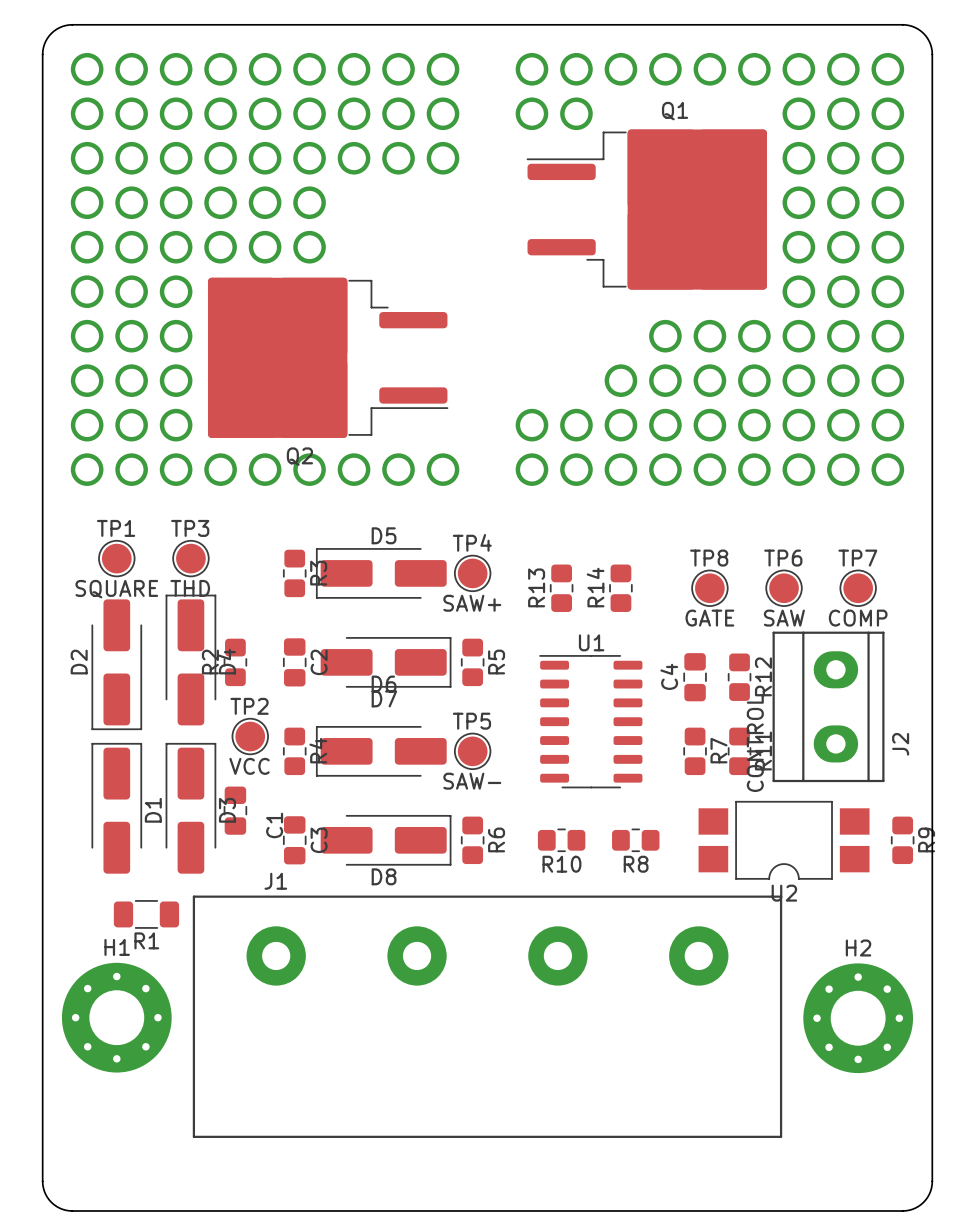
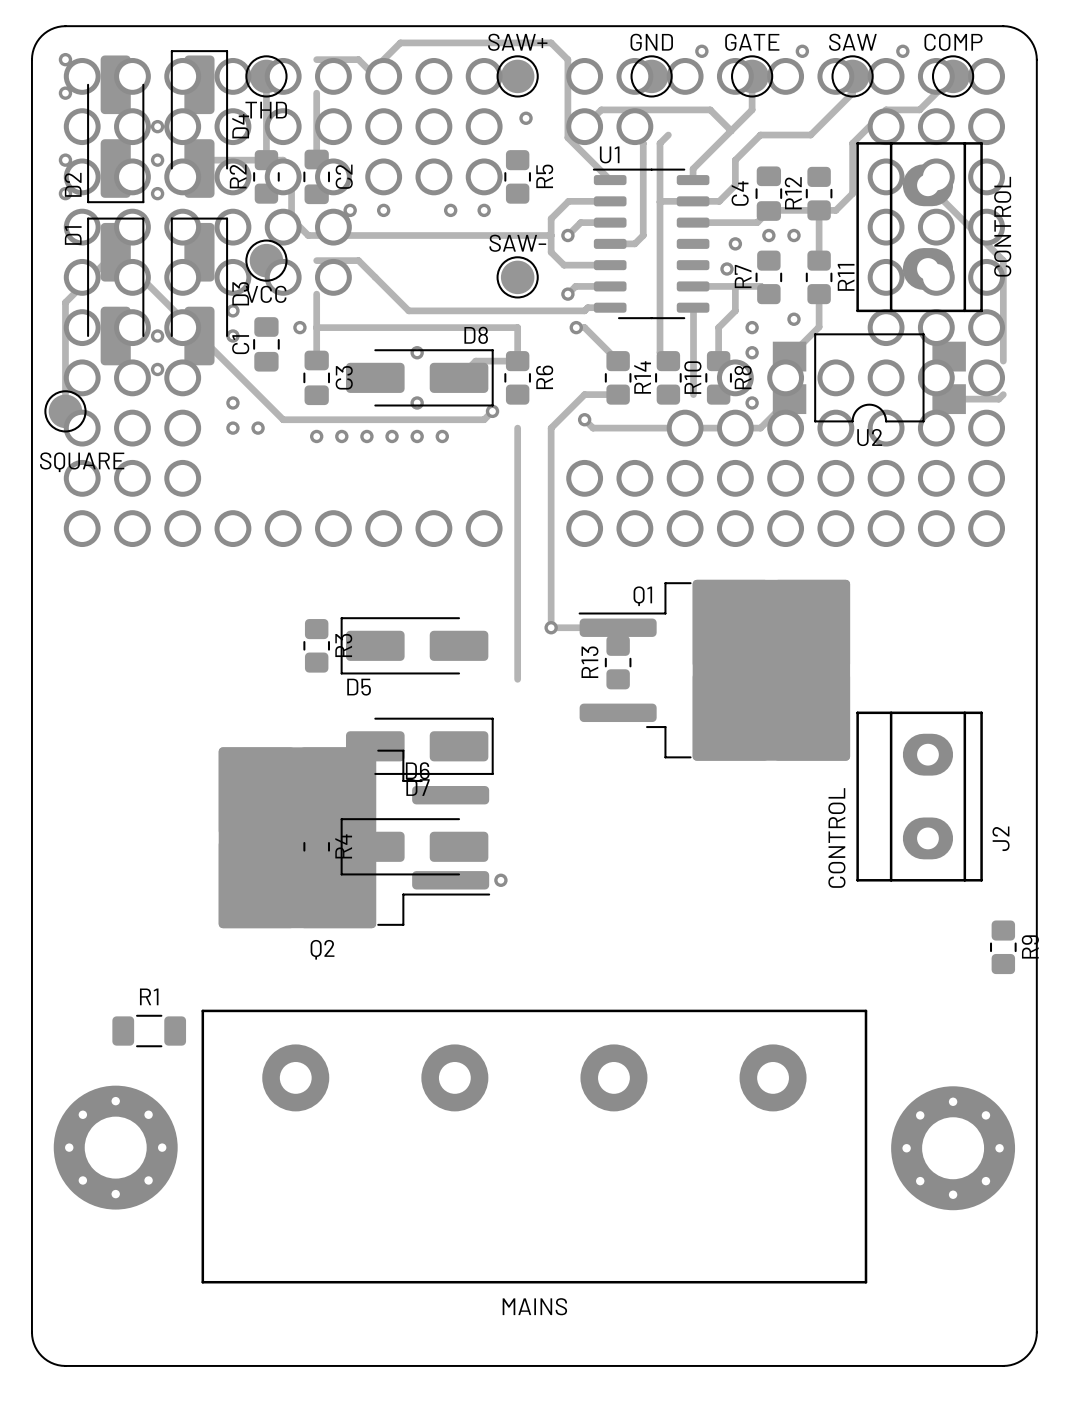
via: none -> (701, 51)
via: none -> (802, 51)
via: none -> (902, 51)
via: none -> (65, 59)
track: none -> (316, 59) (358, 59) (375, 76) (375, 68) (400, 42) (551, 42) (567, 59) (567, 137) (610, 180)
track: none -> (266, 76) (266, 160)
part: none -> THD (266, 76)
part: none -> SAW+ (517, 76)
part: none -> GND (651, 76)
track: none -> (752, 76) (752, 109) (693, 168) (693, 180)
part: none -> GATE (752, 76)
track: none -> (852, 76) (852, 93) (810, 135) (760, 135) (735, 160) (735, 185) (719, 201) (660, 202)
part: none -> SAW (852, 76)
track: none -> (953, 76) (919, 109) (886, 109) (852, 143) (852, 193) (835, 210) (769, 210) (757, 222) (693, 222)
part: none -> COMP (953, 76)
via: none -> (65, 93)
track: none -> (316, 93) (316, 159)
via: none -> (526, 118)
track: none -> (593, 118) (601, 109) (710, 109) (731, 130)
Q1 name position: Q1 (675, 111) -> Q1 (642, 596)
via: none -> (157, 126)
track: none -> (634, 135) (643, 143) (643, 235) (634, 243) (610, 243)
track: none -> (668, 135) (660, 143) (660, 352) (668, 361)
via: none -> (65, 160)
via: none -> (157, 160)
track: none -> (199, 168) (207, 160) (283, 160) (291, 168) (291, 218) (308, 235) (551, 235)
track: none -> (927, 185) (1003, 260) (1003, 361)
via: none -> (65, 193)
via: none -> (157, 193)
track: none -> (610, 201) (568, 201) (551, 218) (551, 252) (564, 265) (610, 265)
via: none -> (350, 210)
via: none -> (383, 210)
via: none -> (450, 210)
via: none -> (484, 210)
track: none -> (819, 210) (819, 260)
track: none -> (610, 222) (580, 222) (567, 235)
part: none -> CONTROL (919, 227)
Q1 position: (646, 209) -> (714, 670)
via: none -> (567, 235)
via: none -> (768, 235)
via: none -> (793, 235)
via: none -> (735, 243)
part: none -> VCC (266, 260)
track: none -> (316, 260) (358, 260) (408, 310) (584, 310) (587, 307) (610, 307)
via: none -> (726, 269)
part: none -> SAW- (517, 277)
track: none -> (610, 286) (575, 286) (567, 294)
track: none -> (693, 286) (761, 286) (768, 294)
track: none -> (735, 286) (735, 310) (718, 327) (718, 361)
track: none -> (316, 294) (316, 360)
via: none -> (567, 294)
track: none -> (819, 294) (819, 327) (789, 356)
track: none -> (693, 307) (693, 394)
via: none -> (232, 310)
via: none -> (793, 319)
via: none -> (299, 327)
track: none -> (316, 327) (517, 327) (517, 361) (475, 361) (459, 377)
track: none -> (576, 327) (584, 327) (618, 361)
via: none -> (576, 327)
via: none -> (752, 327)
via: none -> (157, 335)
via: none -> (232, 335)
via: none -> (417, 352)
via: none -> (752, 352)
via: none -> (157, 369)
track: none -> (618, 394) (584, 394) (551, 428) (551, 627) (618, 627)
track: none -> (1003, 394) (998, 399) (949, 399)
track: none -> (789, 399) (760, 428) (593, 428) (584, 419)
Q2 position: (328, 357) -> (354, 837)
via: none -> (232, 402)
via: none -> (417, 402)
via: none -> (752, 402)
track: none -> (65, 411) (65, 302) (115, 252) (283, 419) (484, 419) (492, 411)
part: none -> SQUARE (65, 411)
via: none -> (492, 411)
via: none -> (584, 419)
via: none -> (232, 428)
via: none -> (258, 428)
track: none -> (517, 428) (517, 679)
via: none -> (316, 436)
via: none -> (341, 436)
via: none -> (366, 436)
via: none -> (392, 436)
via: none -> (417, 436)
via: none -> (442, 436)
D5 name position: D5 (384, 535) -> D5 (359, 687)
via: none -> (551, 627)
TP1: SQUARE (116, 558) -> none
TP3: THD (190, 558) -> none
TP4: SAW+ (472, 573) -> none
R14 name position: R14 (595, 587) -> R14 (642, 377)
R14 position: (620, 588) -> (618, 377)
TP8: GATE (709, 588) -> none
TP6: SAW (784, 588) -> none
TP7: COMP (858, 588) -> none
U1 name position: U1 (591, 642) -> U1 (609, 154)
D4 position: (190, 660) -> (199, 123)
D2 name position: D2 (79, 662) -> D2 (73, 184)
R2 position: (235, 662) -> (266, 176)
C2 position: (294, 662) -> (316, 176)
R5 position: (472, 662) -> (517, 176)
D2 position: (116, 664) -> (115, 129)
R12 name position: R12 (763, 676) -> R12 (793, 193)
C4 position: (695, 677) -> (768, 193)
R12 position: (739, 677) -> (819, 193)
U1 position: (590, 721) -> (651, 243)
TP2: VCC (250, 736) -> none
R7 name position: R7 (718, 750) -> R7 (743, 276)
TP5: SAW- (472, 751) -> none
R7 position: (695, 751) -> (768, 277)
R11 position: (739, 751) -> (819, 277)
via: none -> (500, 880)
D1 position: (116, 808) -> (115, 291)
D3 position: (190, 808) -> (199, 291)
D1 name position: D1 (153, 810) -> D1 (73, 235)
C1 position: (235, 810) -> (266, 344)
C1 name position: C1 (274, 825) -> C1 (240, 344)
C3 position: (294, 840) -> (316, 377)
D8 position: (386, 840) -> (419, 377)
R6 position: (472, 840) -> (517, 377)
R10 rotation: 0° (561, 840) -> 90° clockwise (668, 377)
R10 position: (561, 840) -> (668, 377)
R8 rotation: 0° (635, 840) -> 90° clockwise (718, 377)
R8 position: (635, 840) -> (718, 377)
U2 position: (784, 840) -> (869, 377)
R10 name position: R10 (561, 864) -> R10 (692, 377)
R8 name position: R8 (636, 864) -> R8 (743, 377)
D8 name position: D8 (384, 876) -> D8 (476, 335)
J1 name: J1 (275, 881) -> none
R1 name position: R1 (146, 940) -> R1 (149, 996)
H1 name: H1 (117, 947) -> none
H2 name: H2 (858, 948) -> none
J1 value: none -> MAINS (534, 1306)

